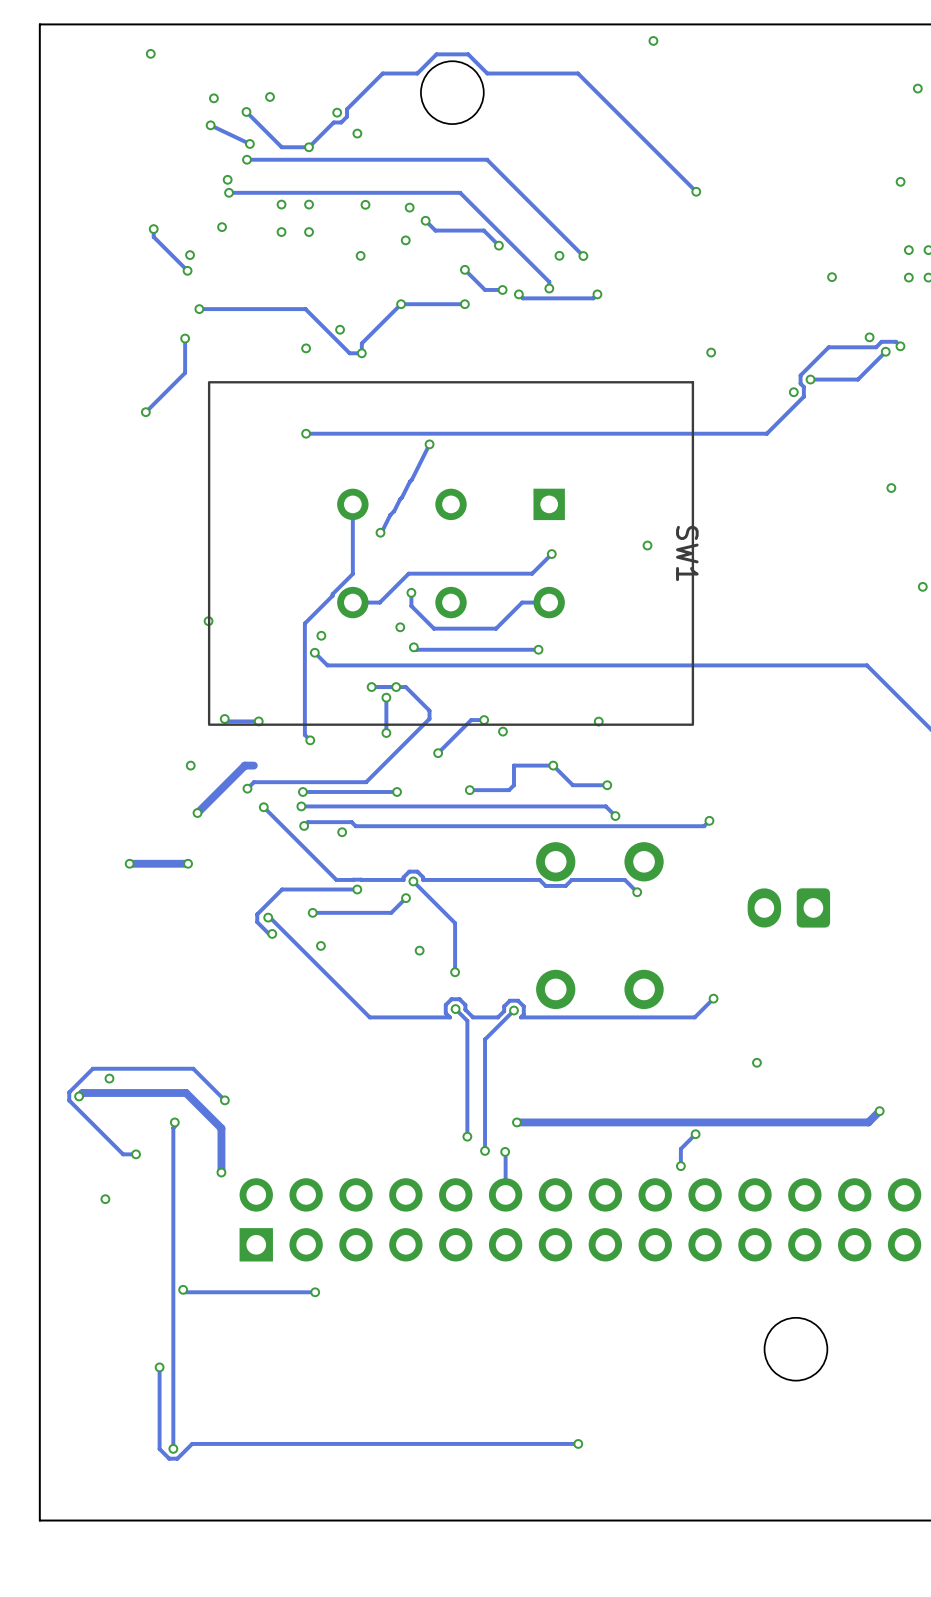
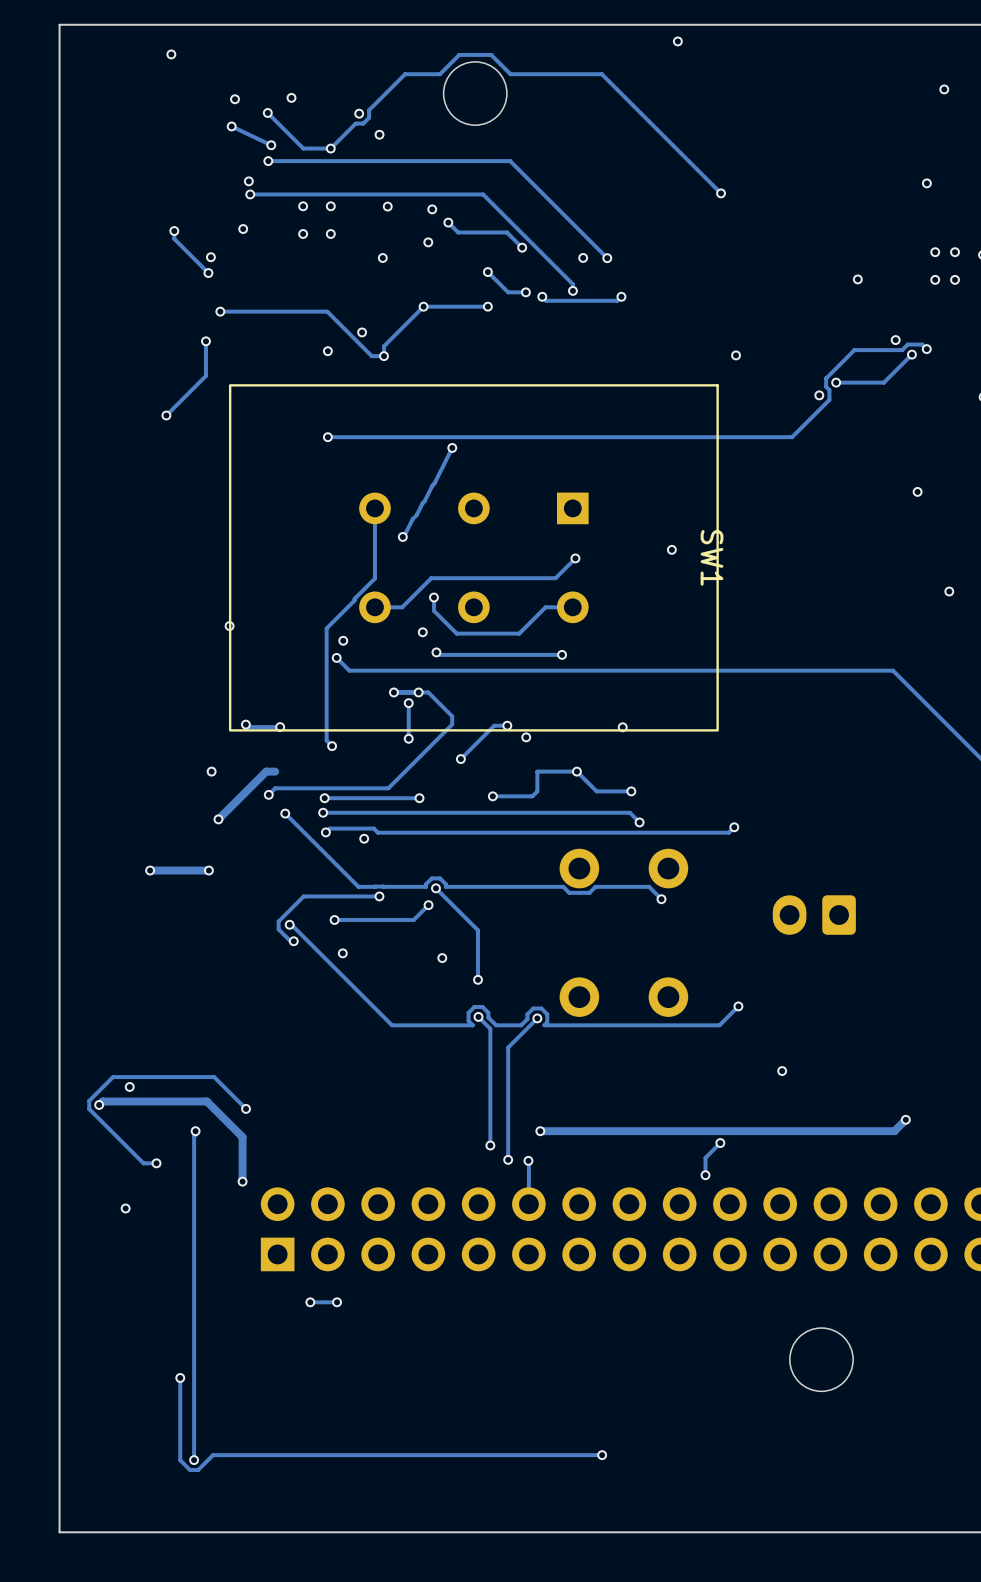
track: (183, 1289) (185, 1292) (288, 1292) -> none
via position: (183, 1289) -> (310, 1302)

